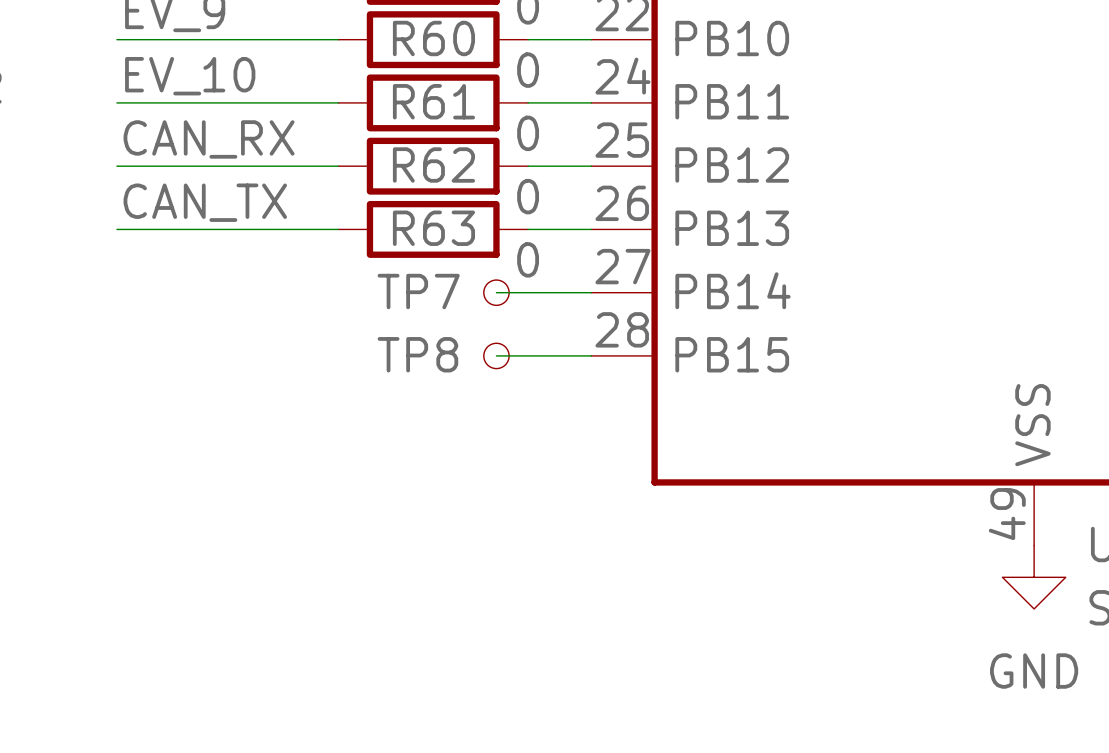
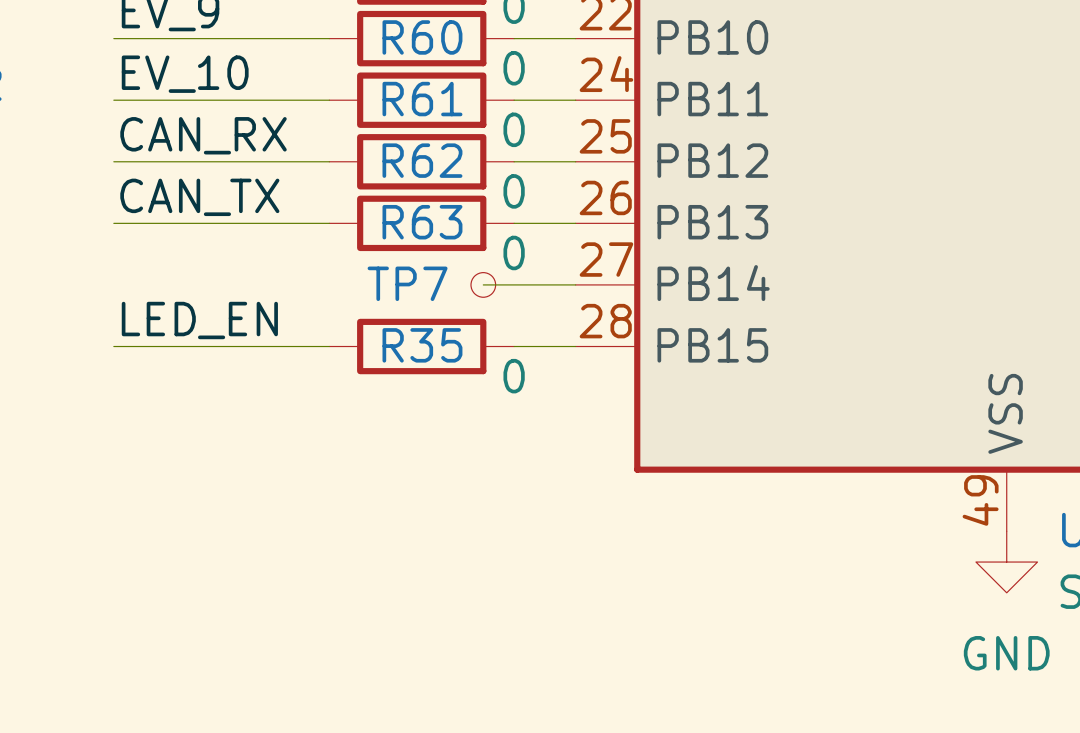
label: none -> LED_EN (199, 320)
wire: none -> (113, 346) (329, 346)
R35: none -> 0 (421, 346)
TP8: (496, 355) -> none

